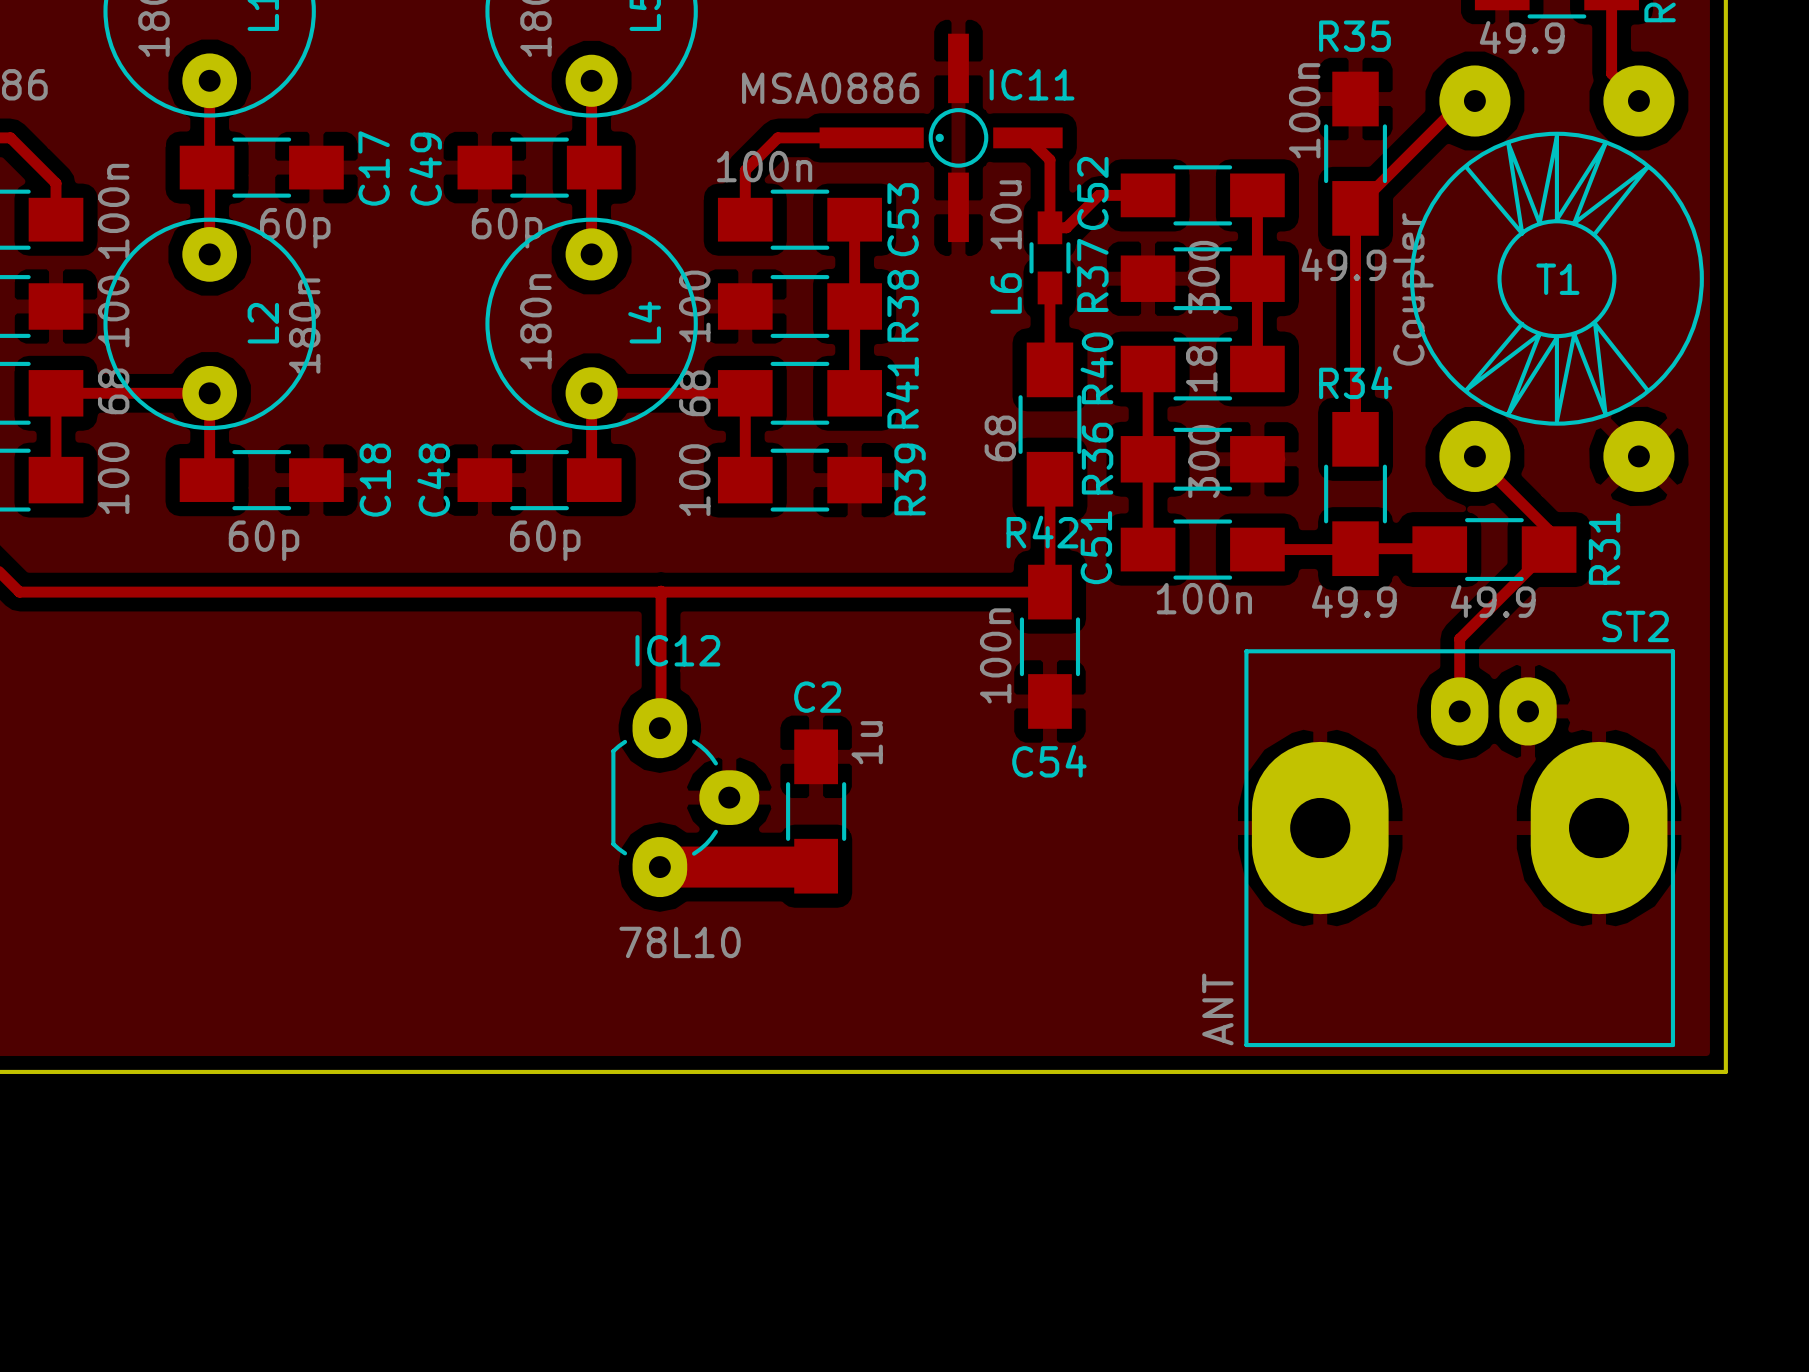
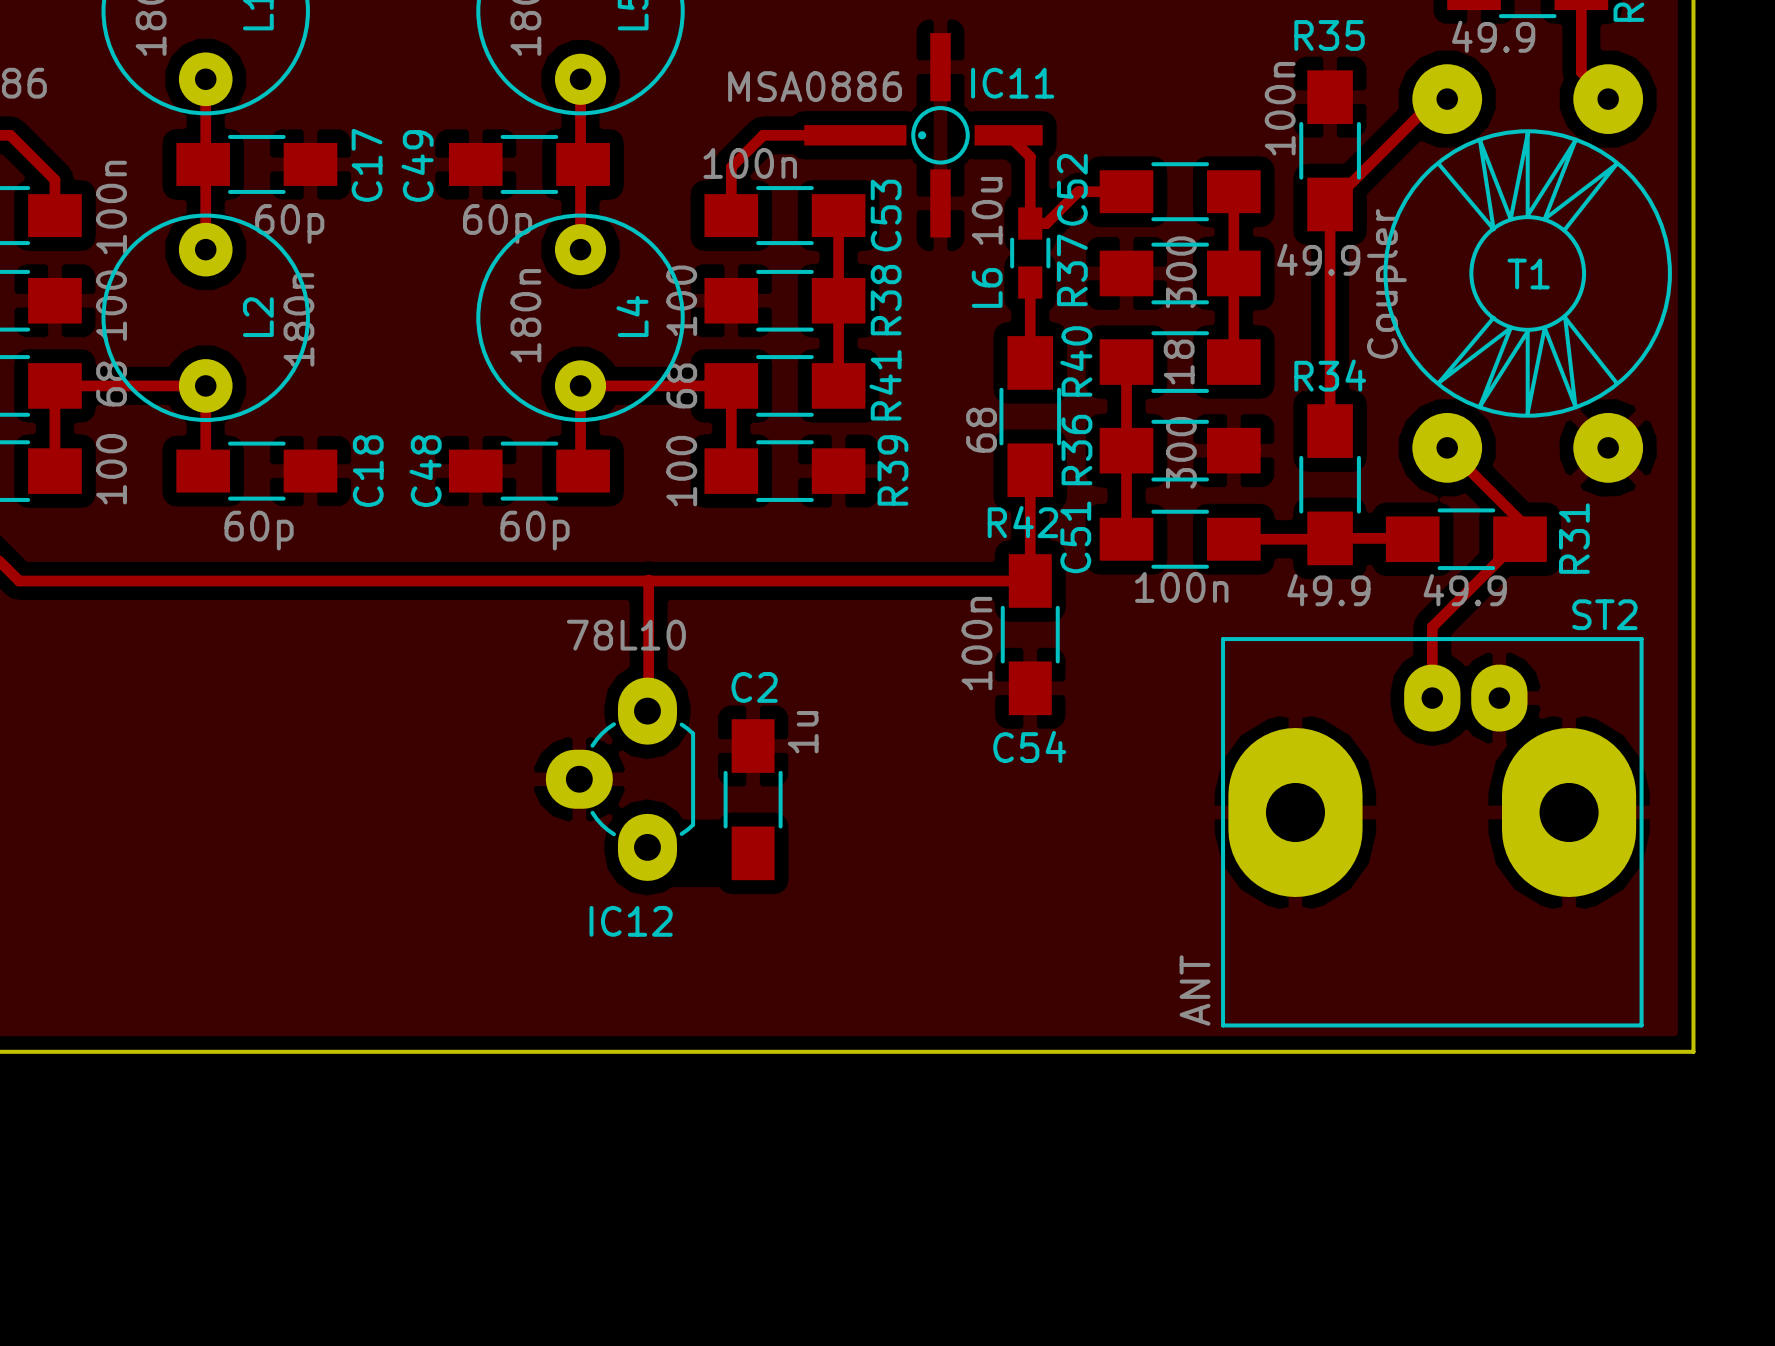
IC12 name position: IC12 (677, 650) -> IC12 (631, 921)
IC12 footprint: [611, 698, 760, 898] -> [545, 677, 696, 881]
C2 position: (816, 811) -> (753, 799)
track: (816, 866) (659, 867) -> none
IC12 value position: 78L10 (680, 942) -> 78L10 (626, 635)

